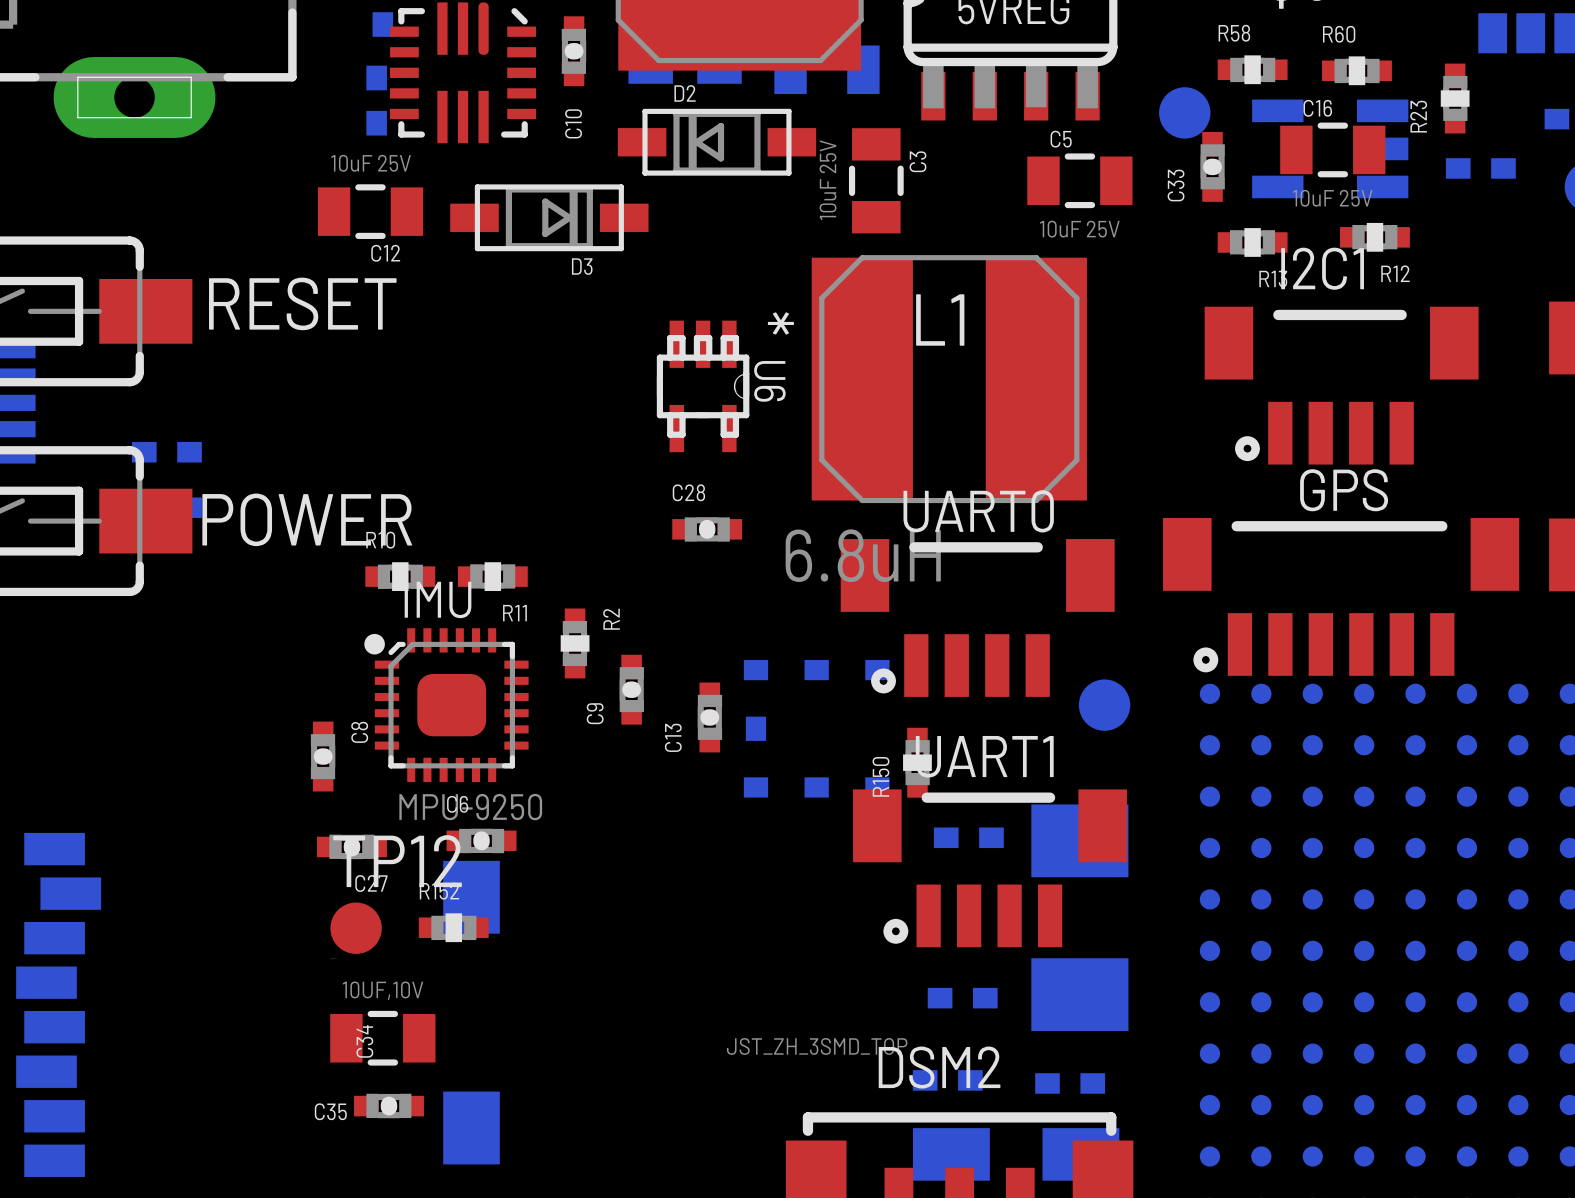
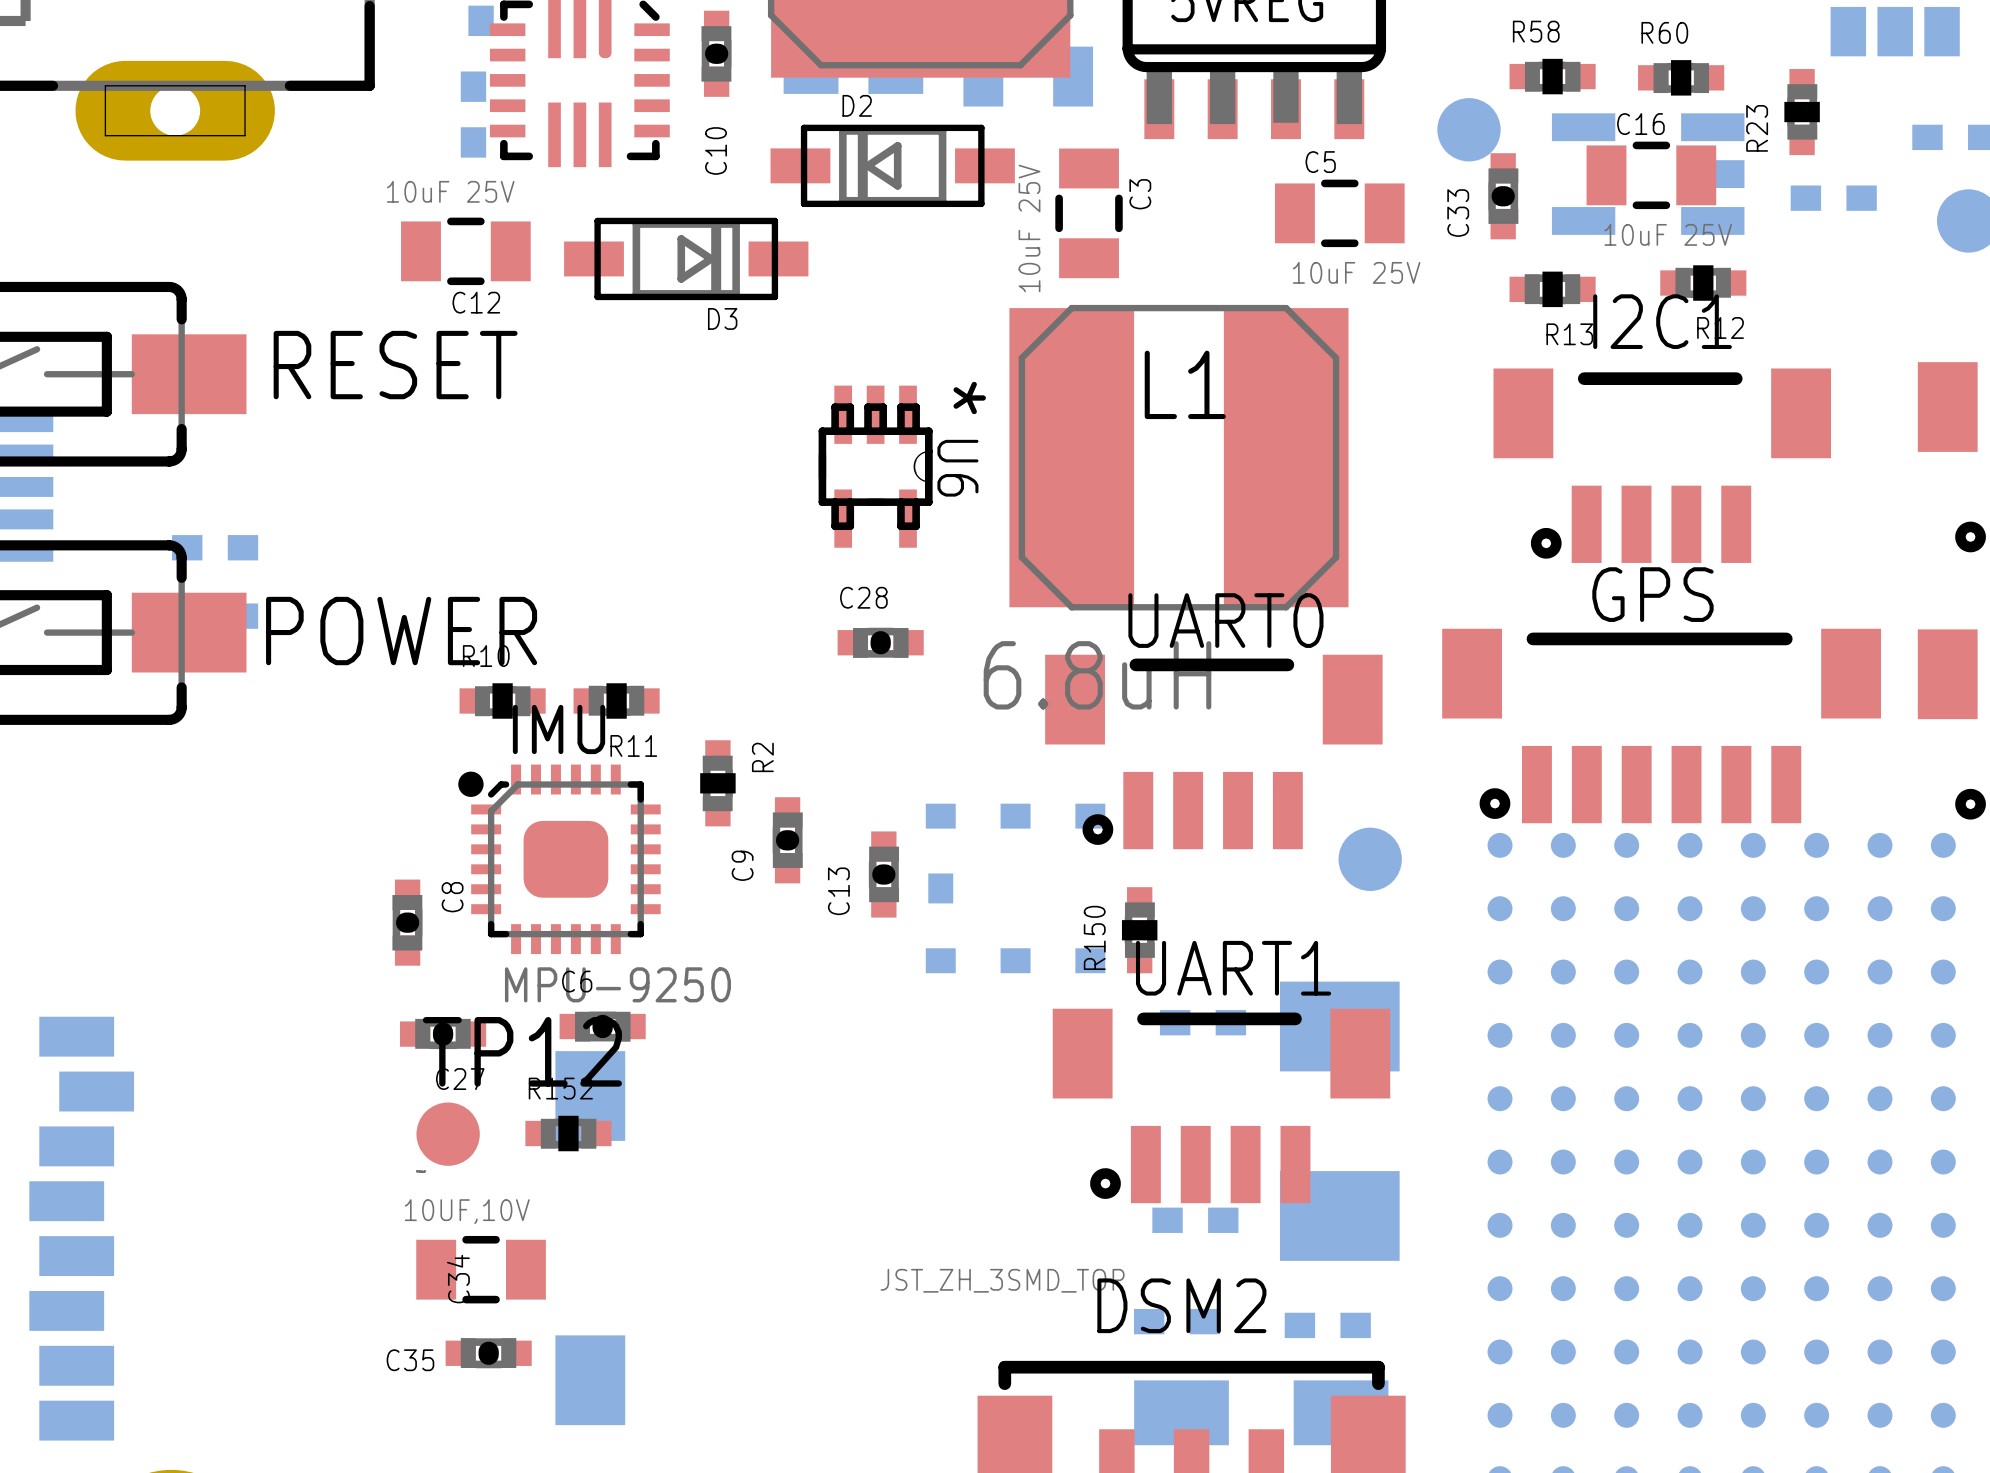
UART1 position: (990, 868) -> (1221, 1105)

